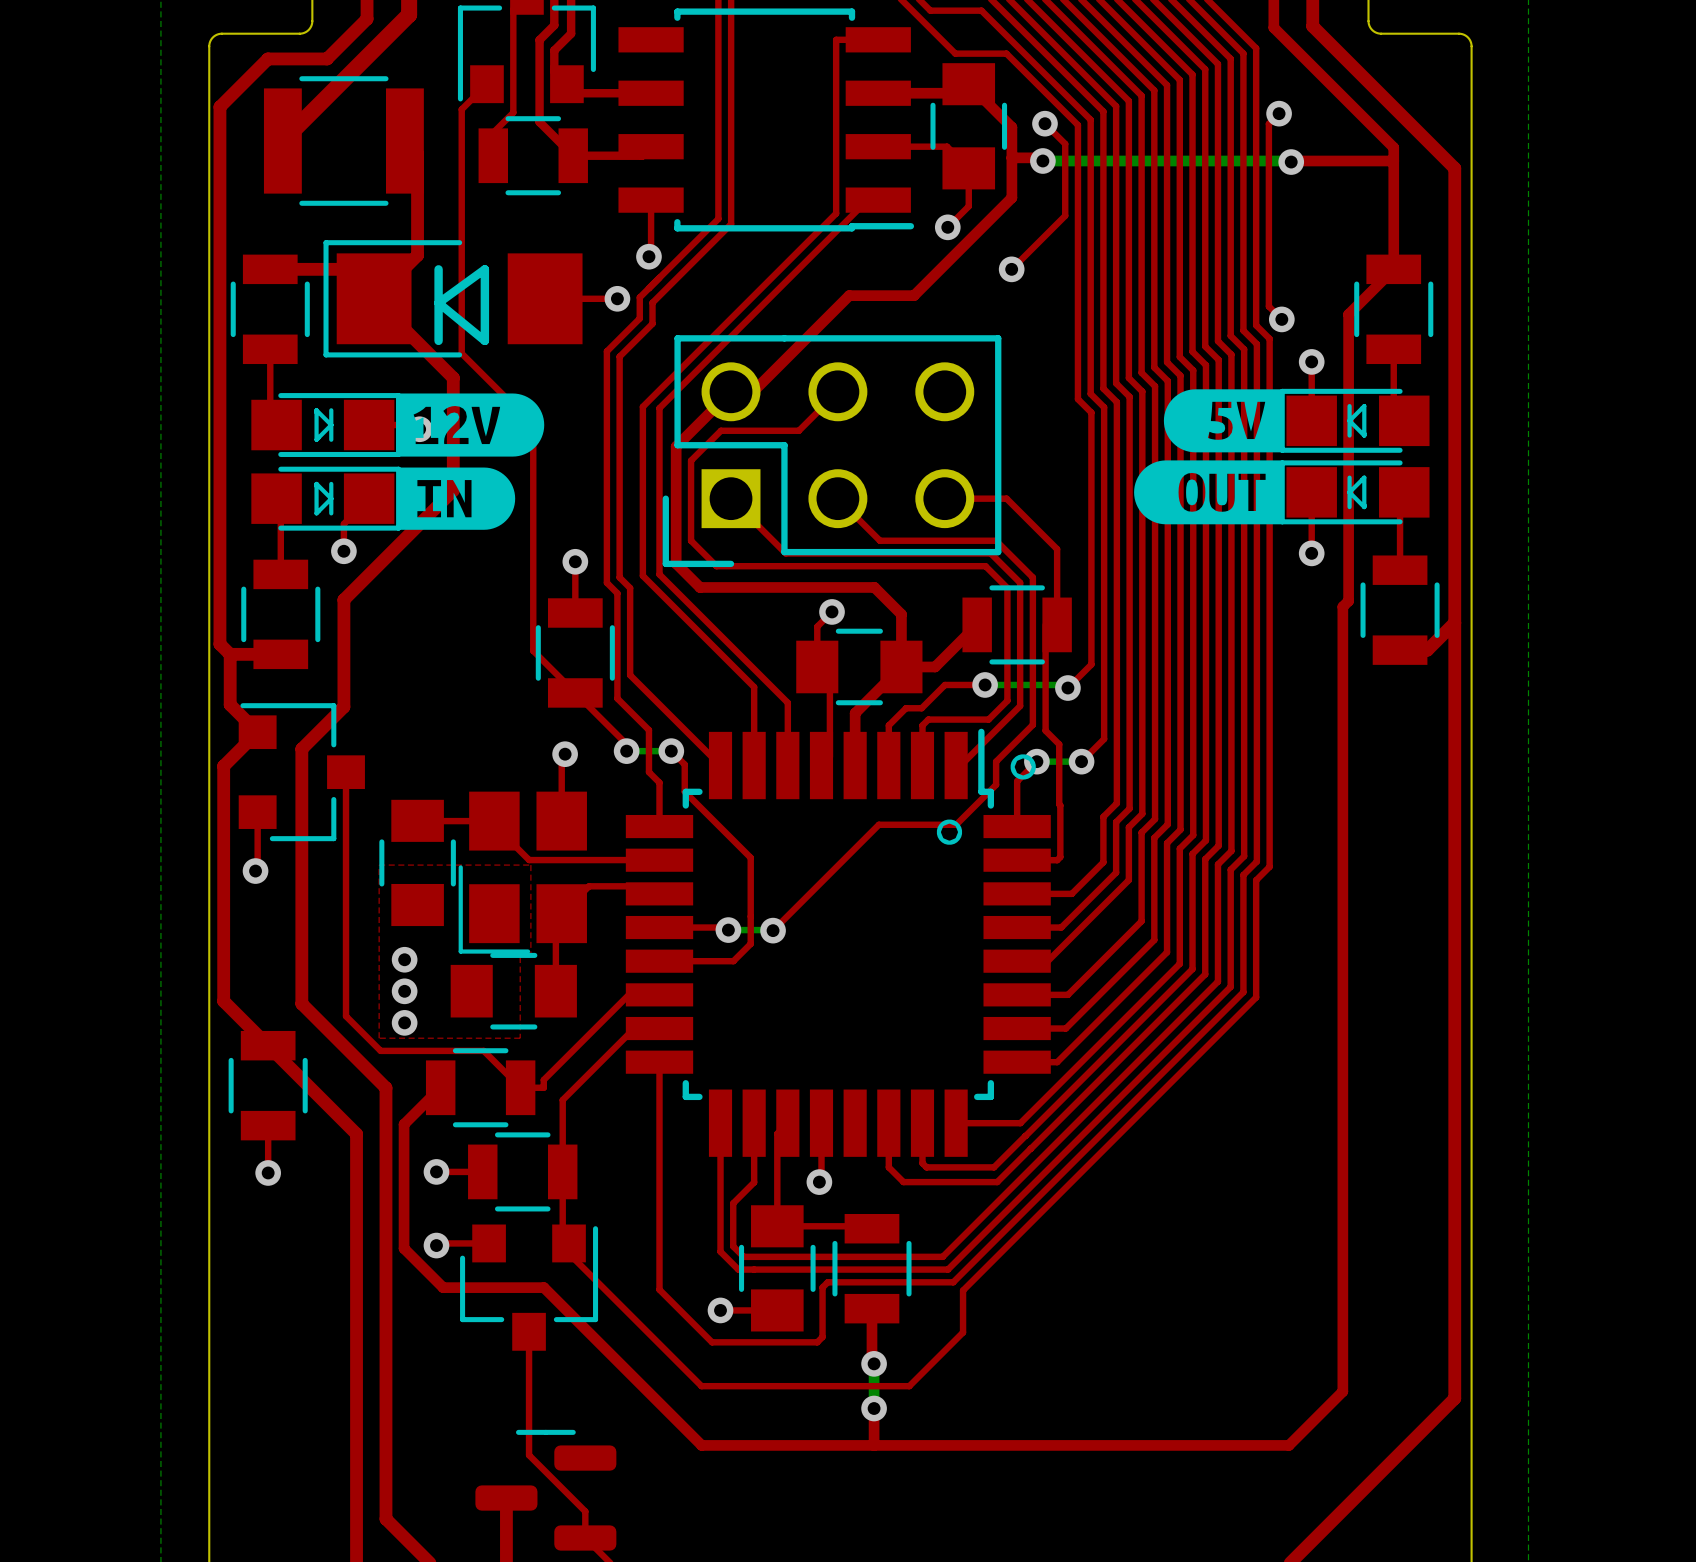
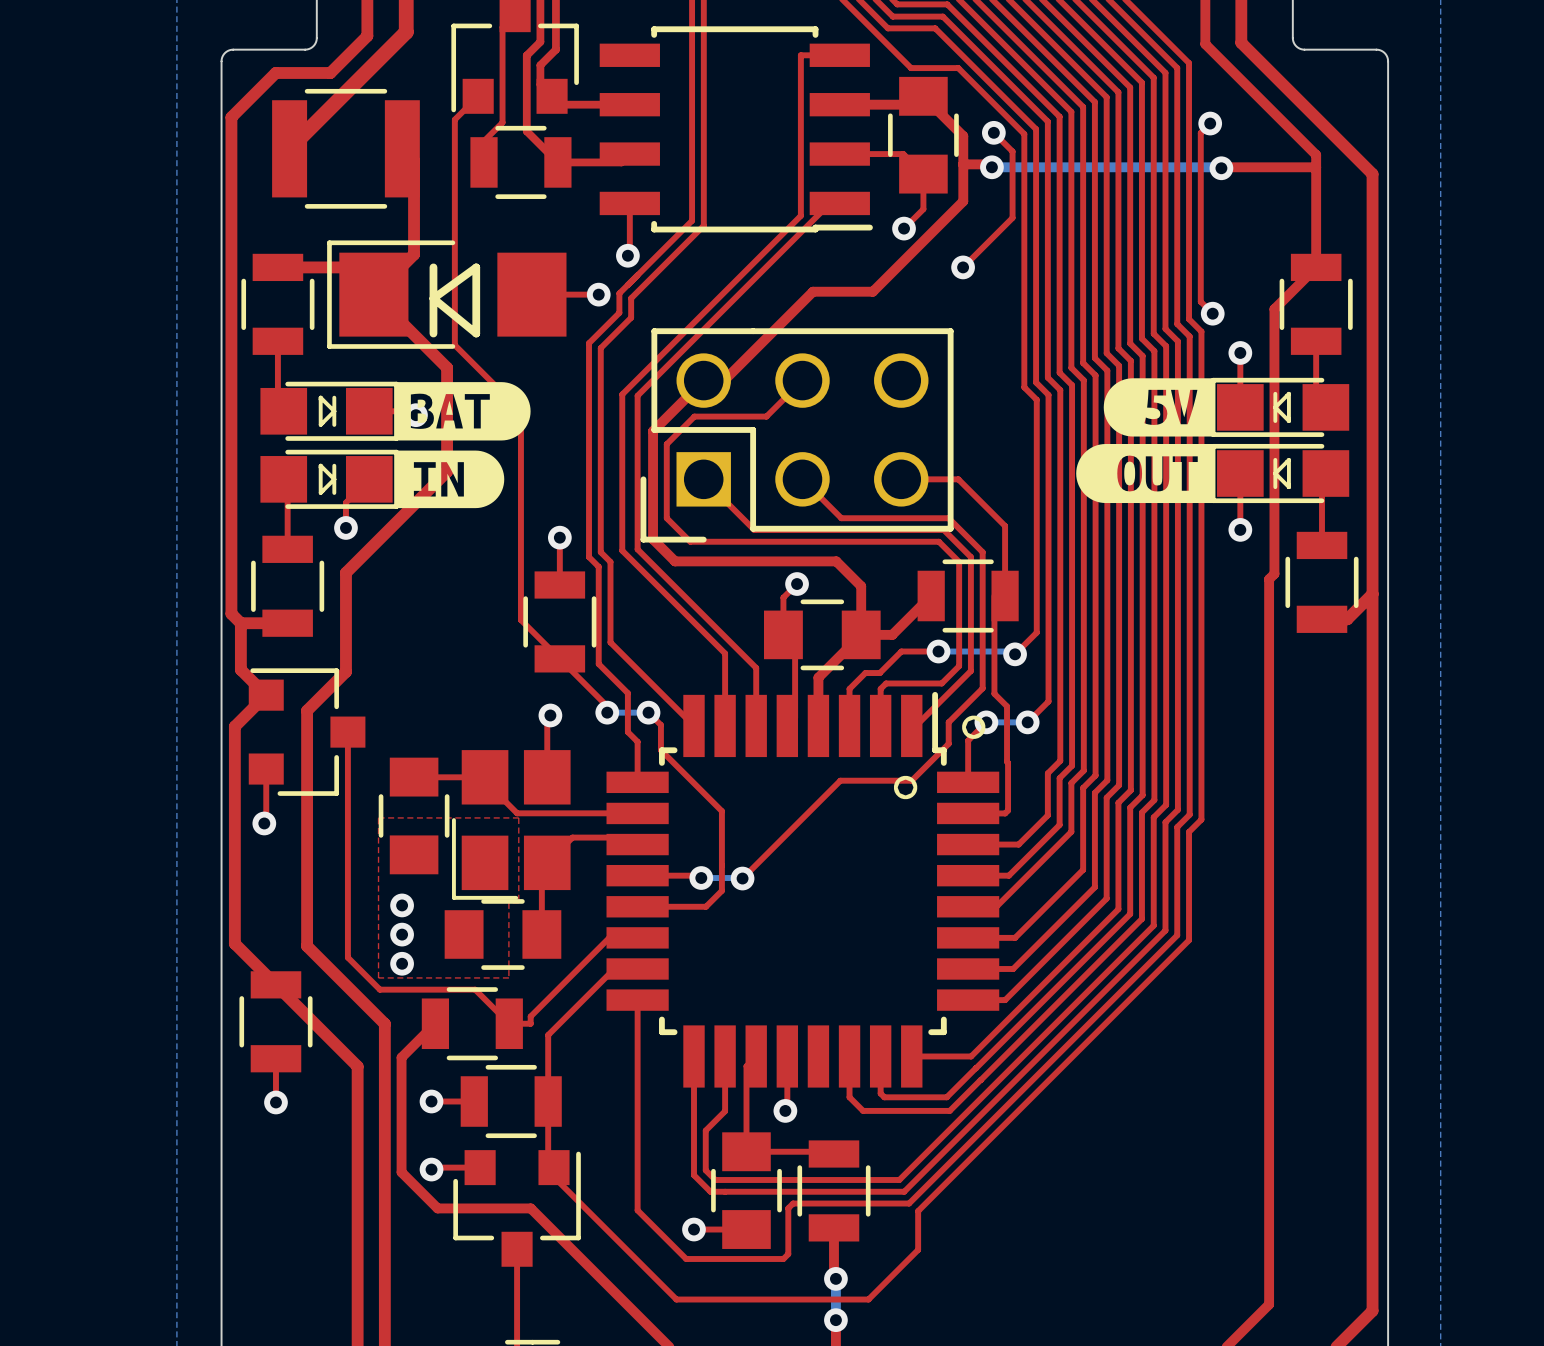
drawing shape: [396, 393, 545, 457] -> [394, 382, 531, 441]

